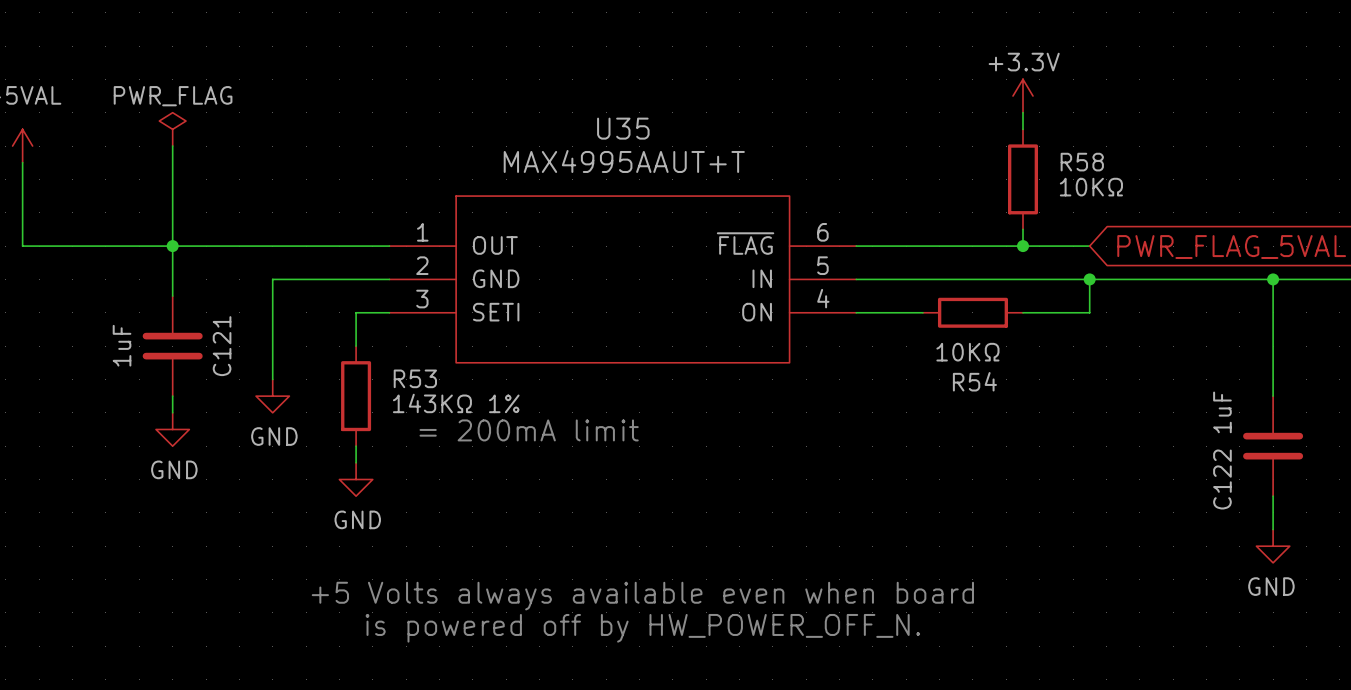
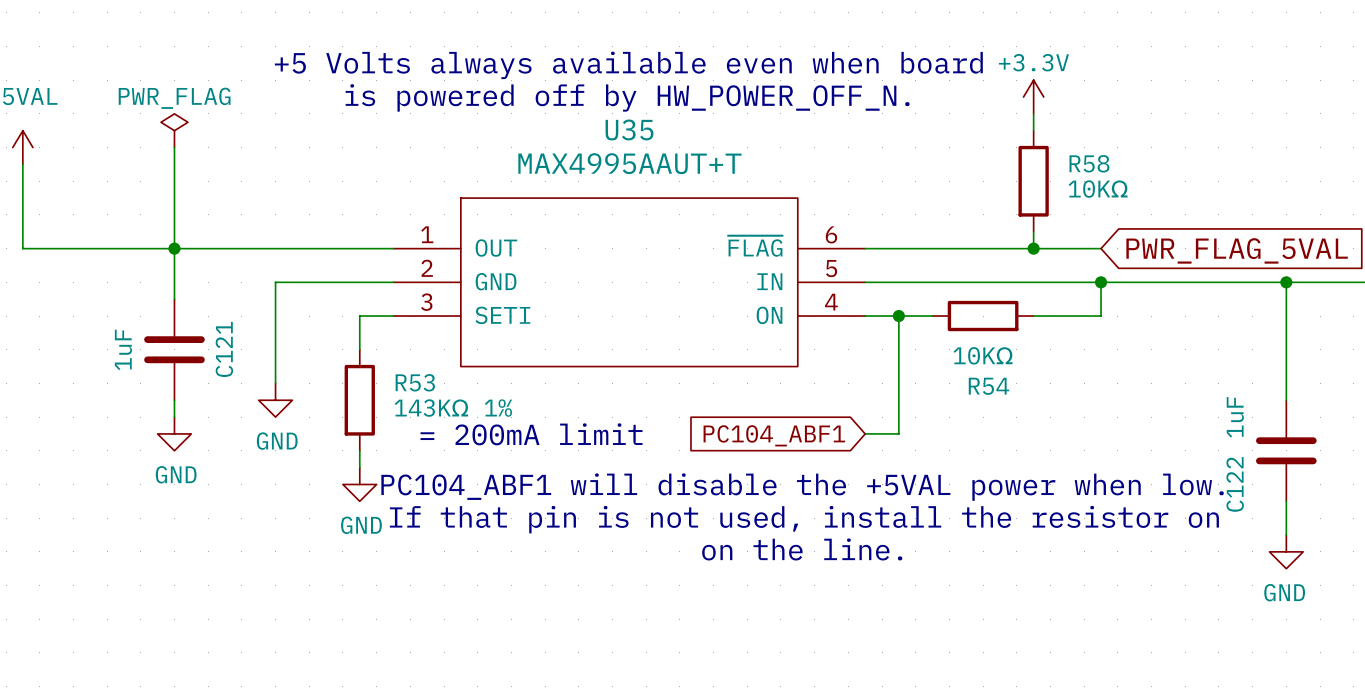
text: none -> +5 Volts always available even when board (628, 65)
text: none -> is powered off by HW_POWER_OFF_N. (627, 97)
wire: none -> (898, 316) (898, 433) (865, 433)
junction: none -> (898, 316)
global label: none -> PC104_ABF1 (774, 435)
text: none -> PC104_ABF1 will disable the +5VAL power when low. (802, 487)
text: none -> If that pin is not used, install the resistor on (804, 519)
text: none -> on the line. (802, 549)
text: +5 Volts always available even when board (642, 596) -> none
text: is powered off by HW_POWER_OFF_N. (642, 628) -> none

